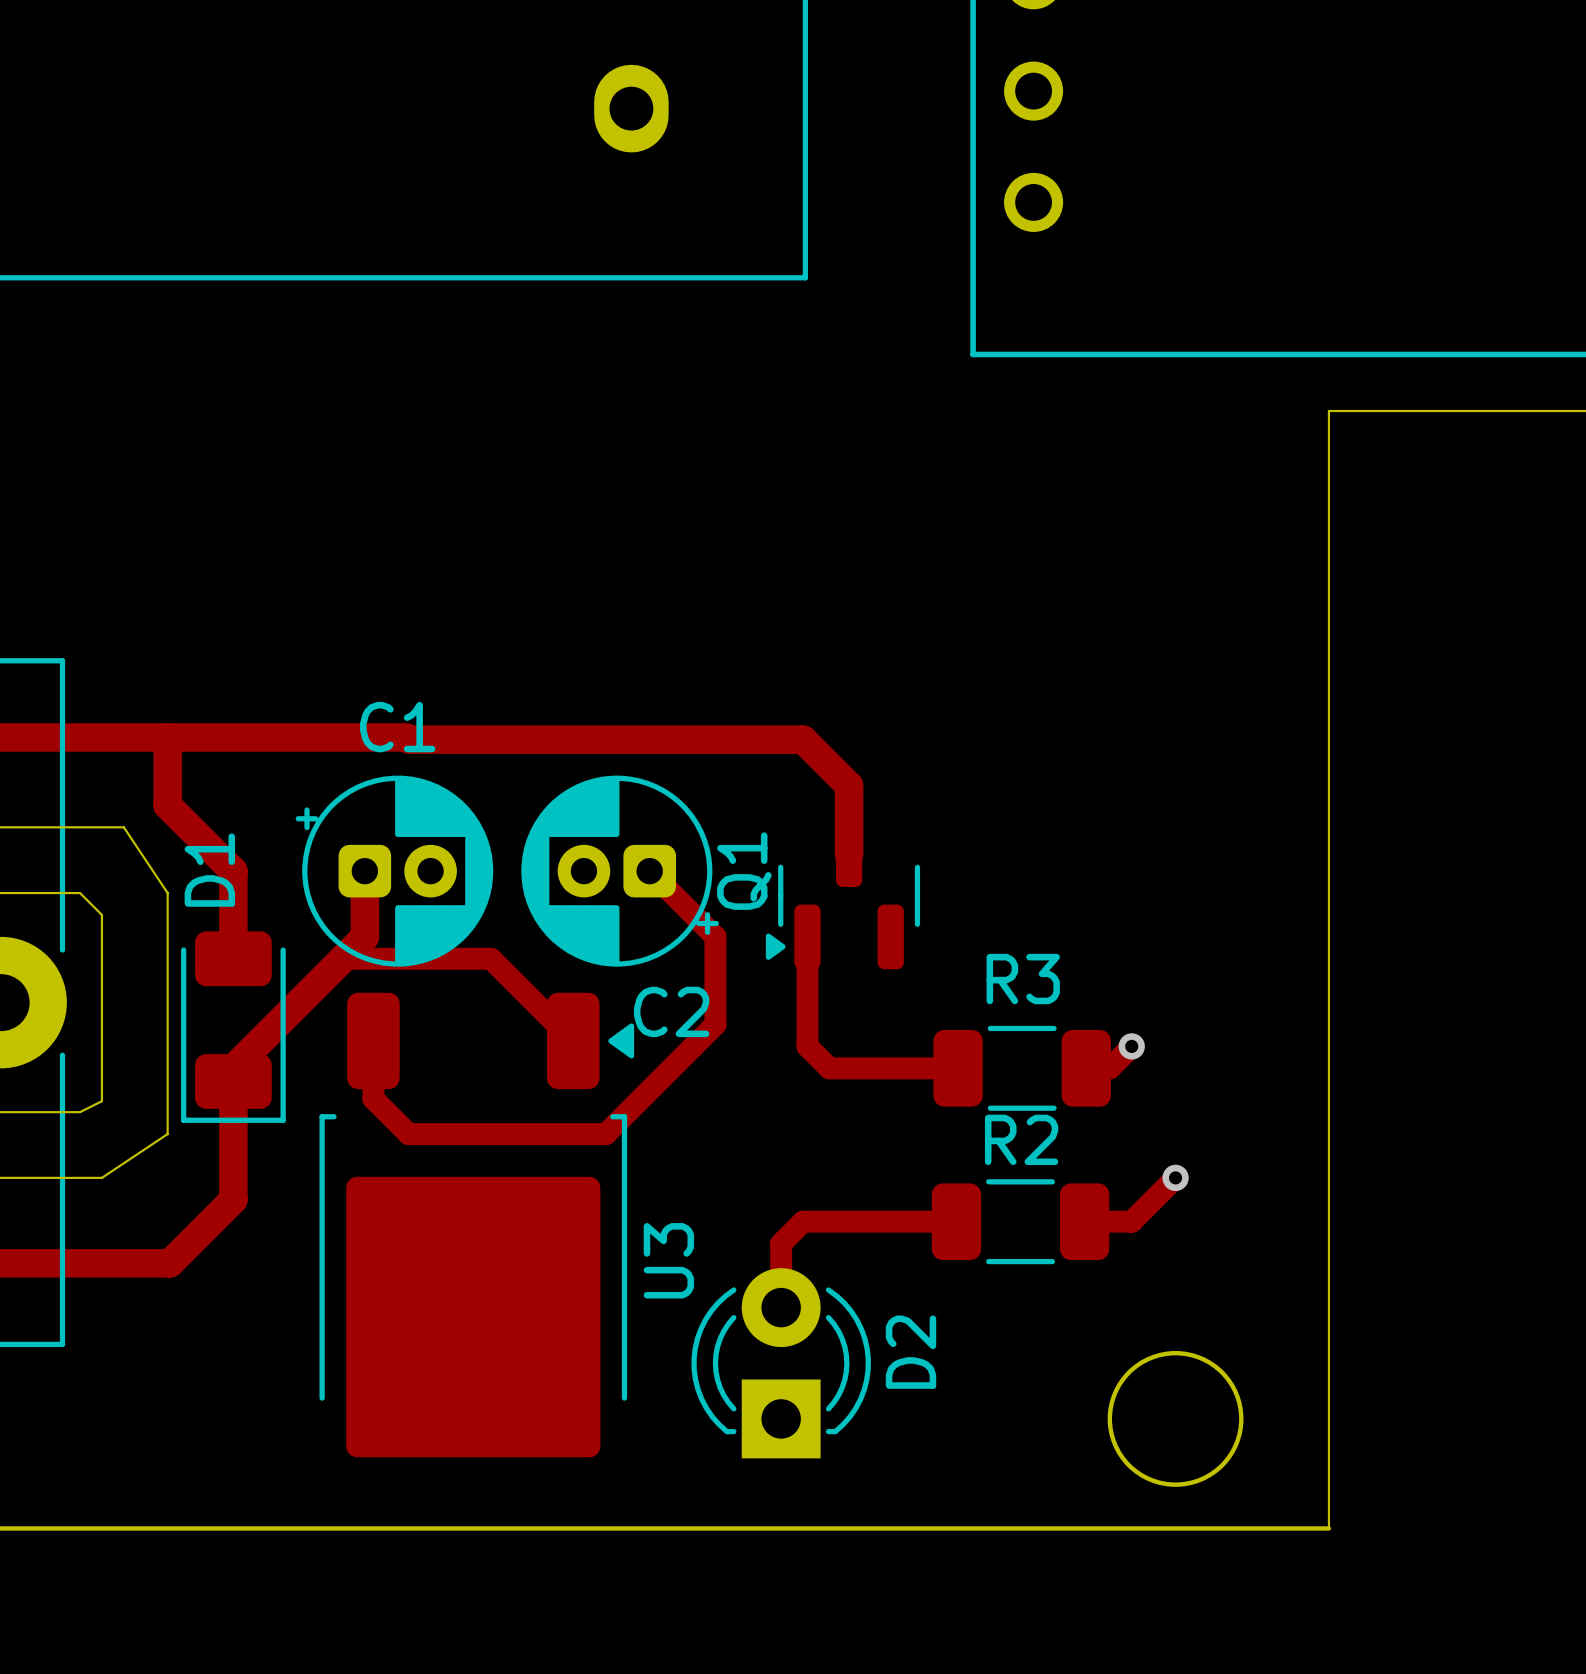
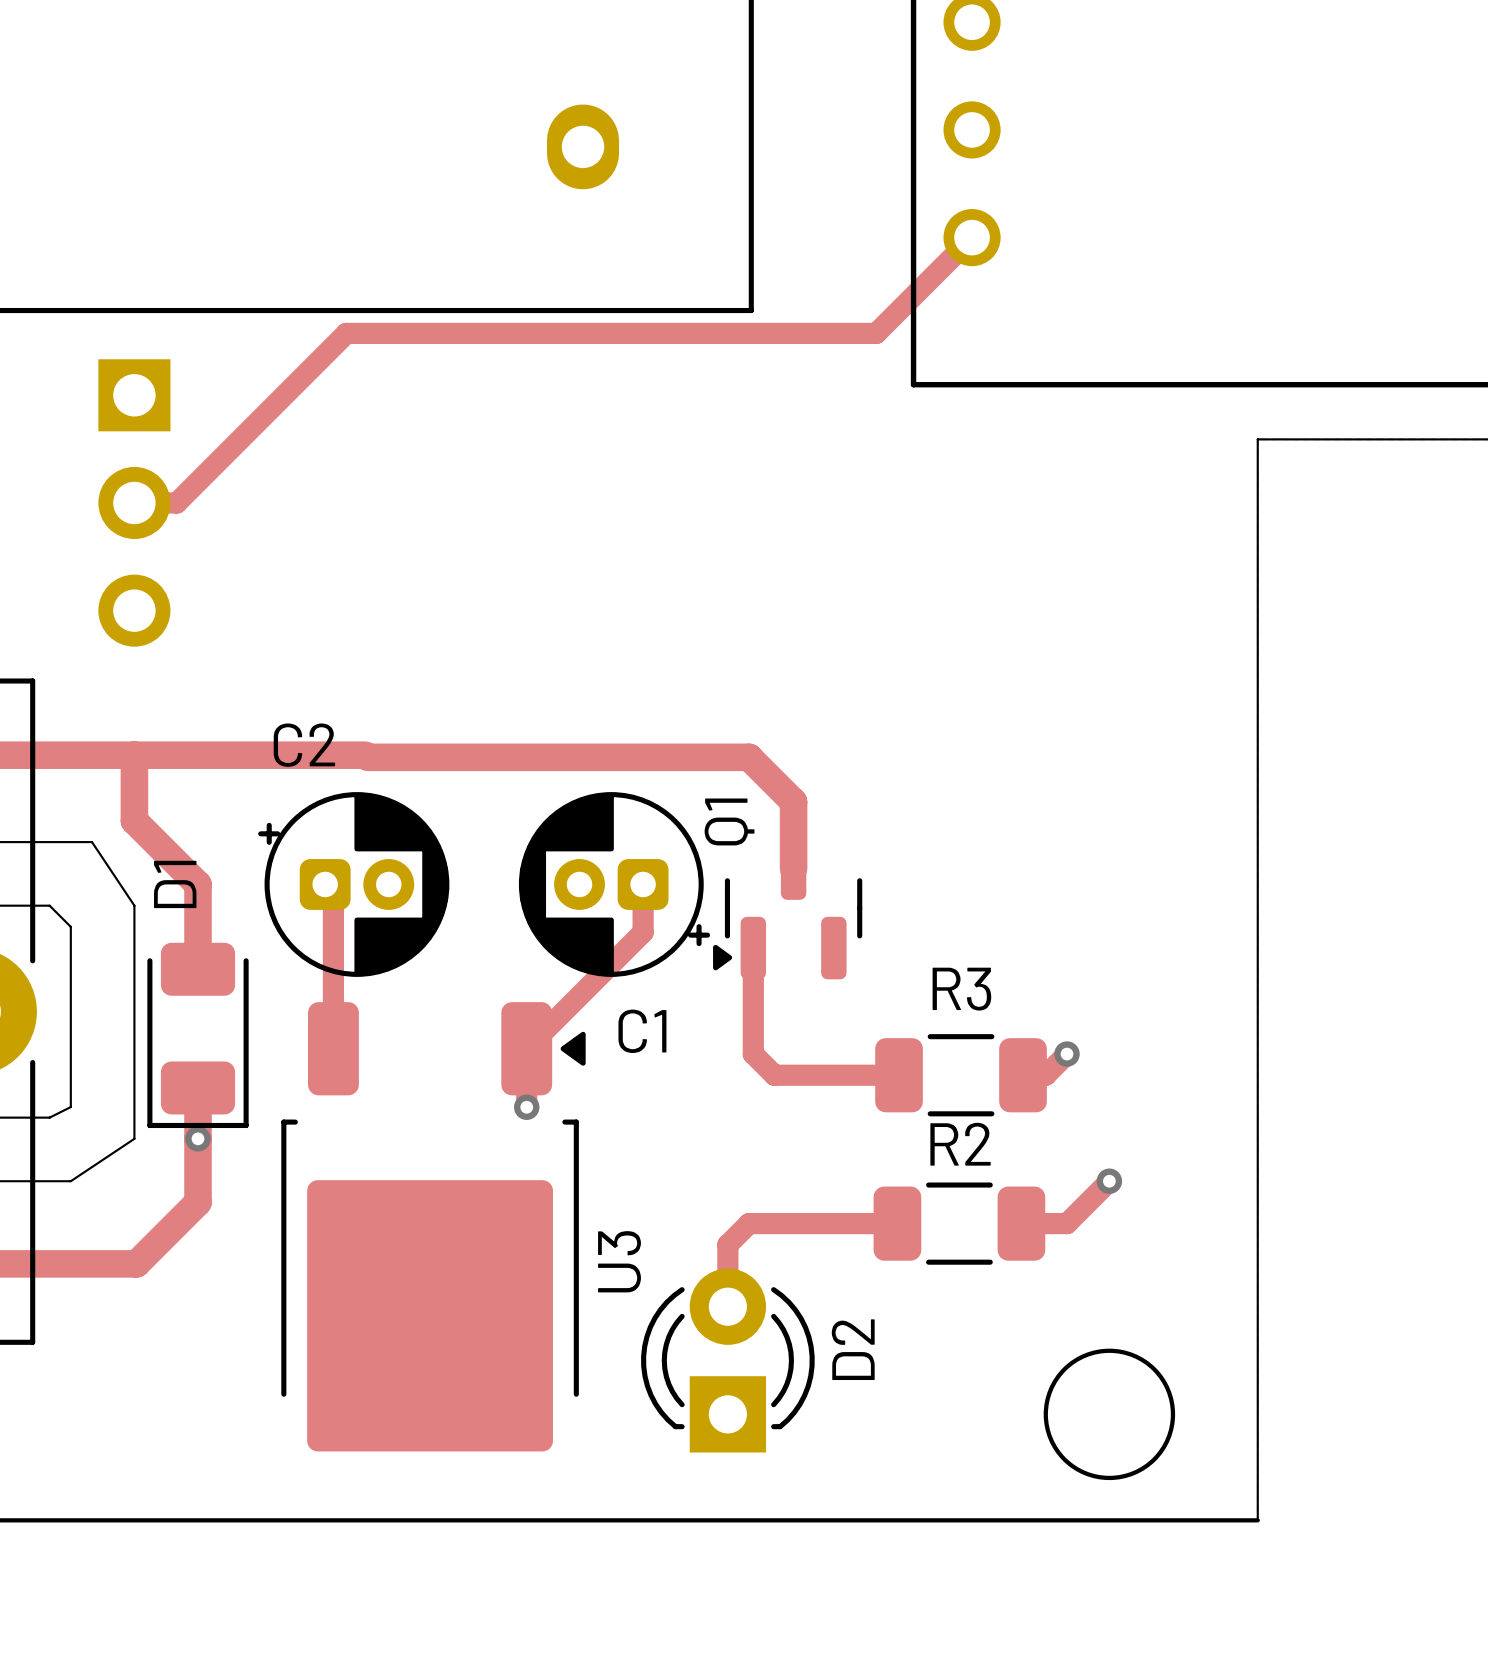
track: none -> (972, 237) (876, 333) (346, 333) (176, 502) (134, 502)
part: none -> (134, 502)
C1 name: C1 (397, 727) -> C2 (304, 745)
track: (364, 871) (364, 936) (233, 1068) -> (325, 884) (333, 892) (333, 1048)
C2 position: (620, 871) -> (614, 884)
track: (649, 871) (715, 936) (715, 1024) (605, 1134) (408, 1134) (373, 1098) (373, 1040) -> none
track: none -> (643, 884) (643, 932) (526, 1048) (526, 1107)
Q1 name position: Q1 (744, 871) -> Q1 (729, 821)
track: (342, 958) (491, 958) (573, 1040) -> none
C2 name: C2 (671, 1011) -> C1 (642, 1031)
via: none -> (526, 1107)
via: none -> (198, 1138)

